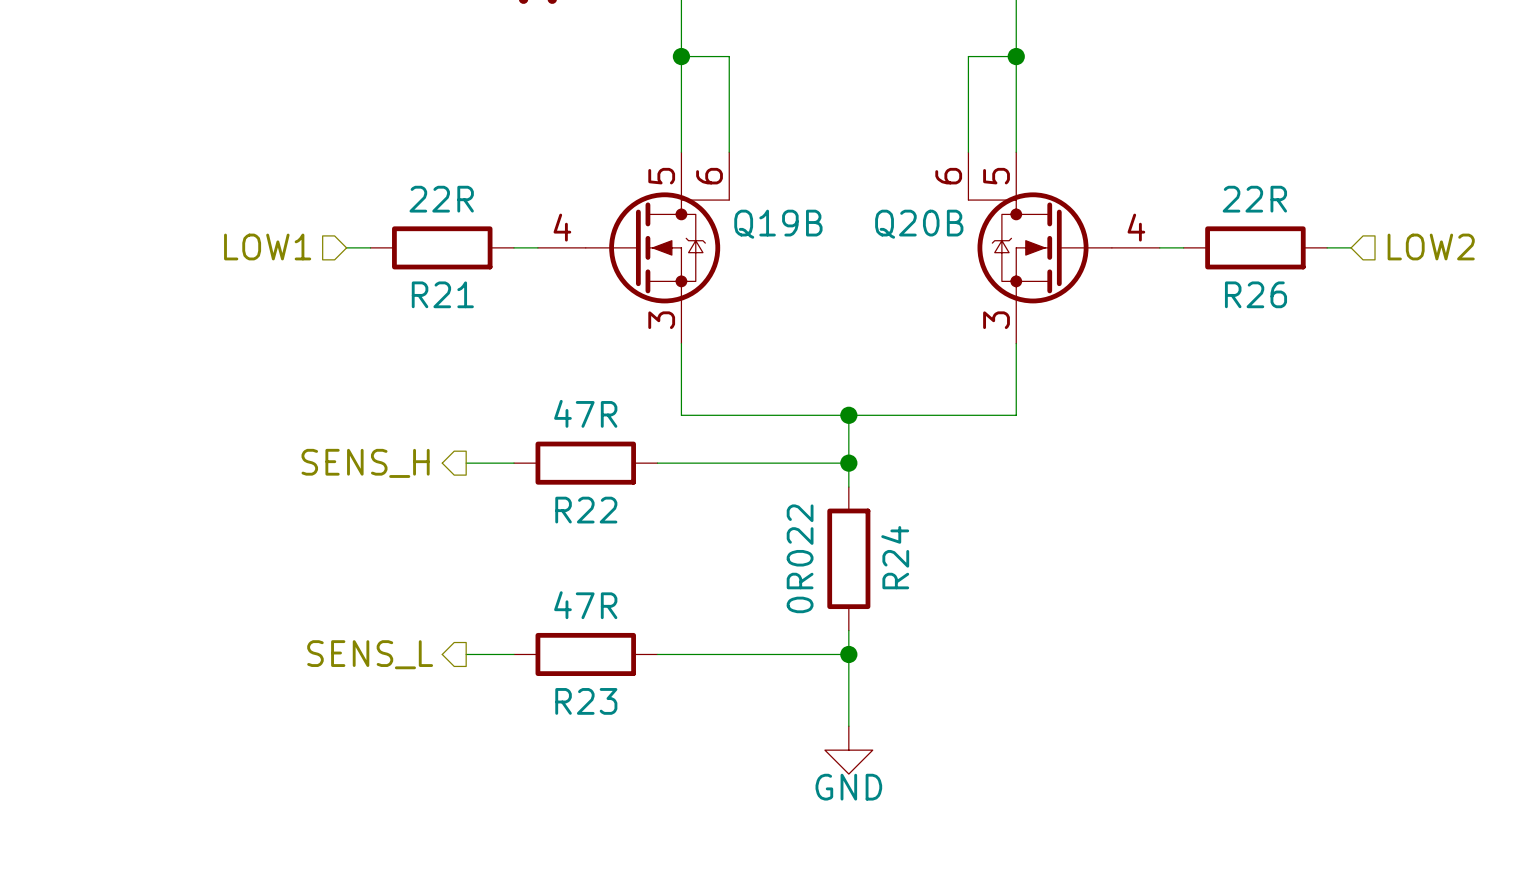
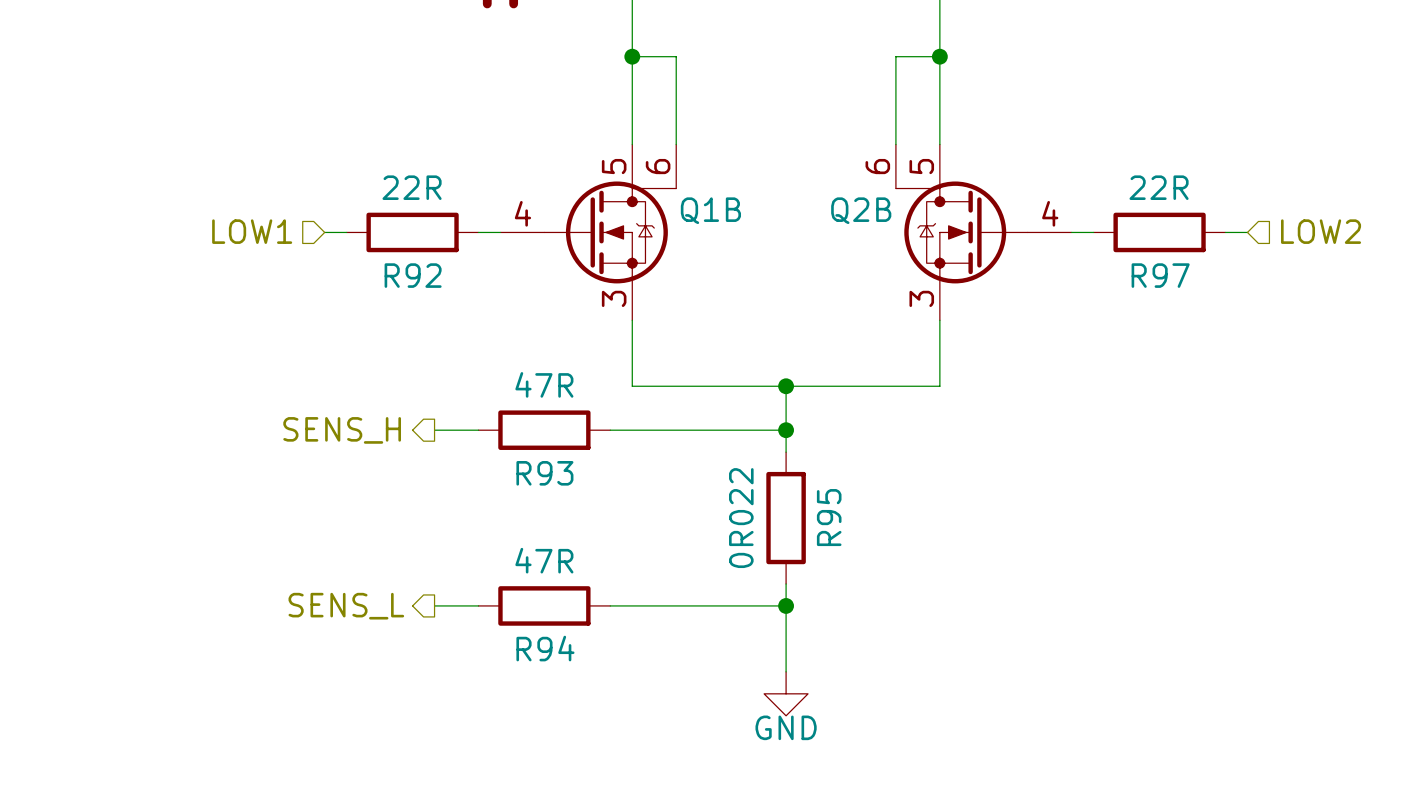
Q19B name: Q19B (778, 224) -> Q1B (710, 210)
Q20B name: Q20B (919, 224) -> Q2B (861, 210)
R21 name: R21 (442, 294) -> R92 (413, 275)
R26 name: R26 (1255, 294) -> R97 (1160, 275)
R22 name: R22 (586, 510) -> R93 (544, 473)
R24 name: R24 (895, 557) -> R95 (829, 517)
R23 name: R23 (586, 701) -> R94 (545, 648)

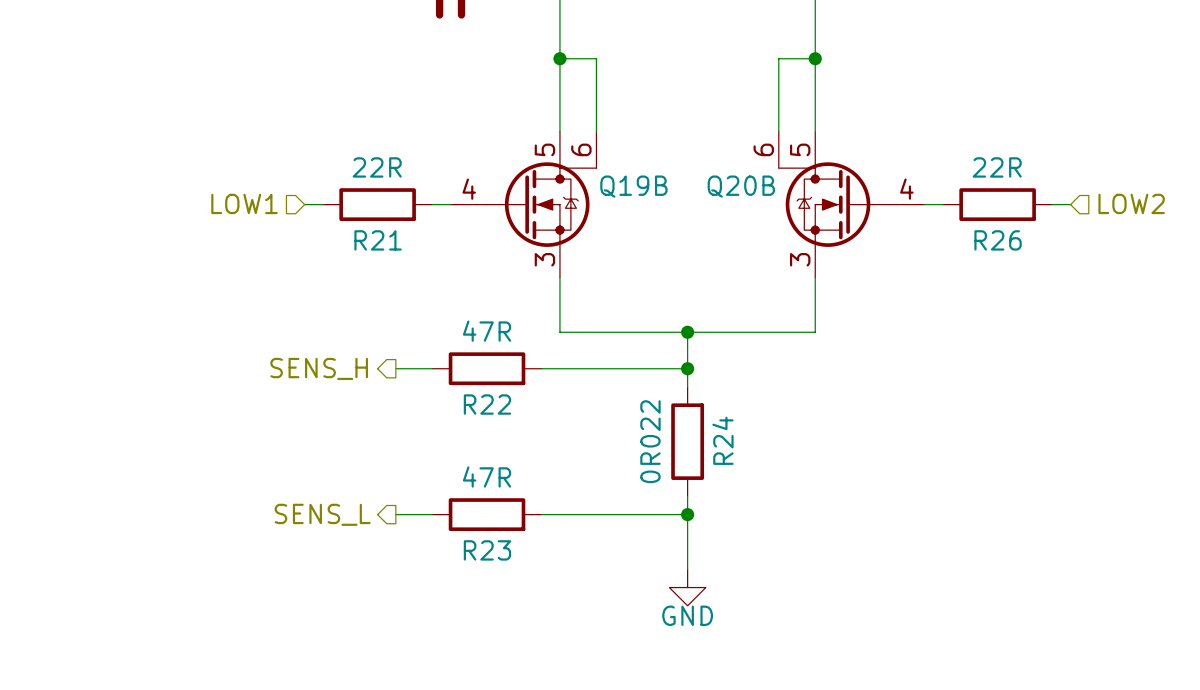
Q1B name: Q1B (710, 210) -> Q19B (633, 186)
Q2B name: Q2B (861, 210) -> Q20B (741, 186)
R92 name: R92 (413, 275) -> R21 (378, 240)
R97 name: R97 (1160, 275) -> R26 (998, 240)
R93 name: R93 (544, 473) -> R22 (487, 404)
R95 name: R95 (829, 517) -> R24 (722, 440)
R94 name: R94 (545, 648) -> R23 (487, 550)

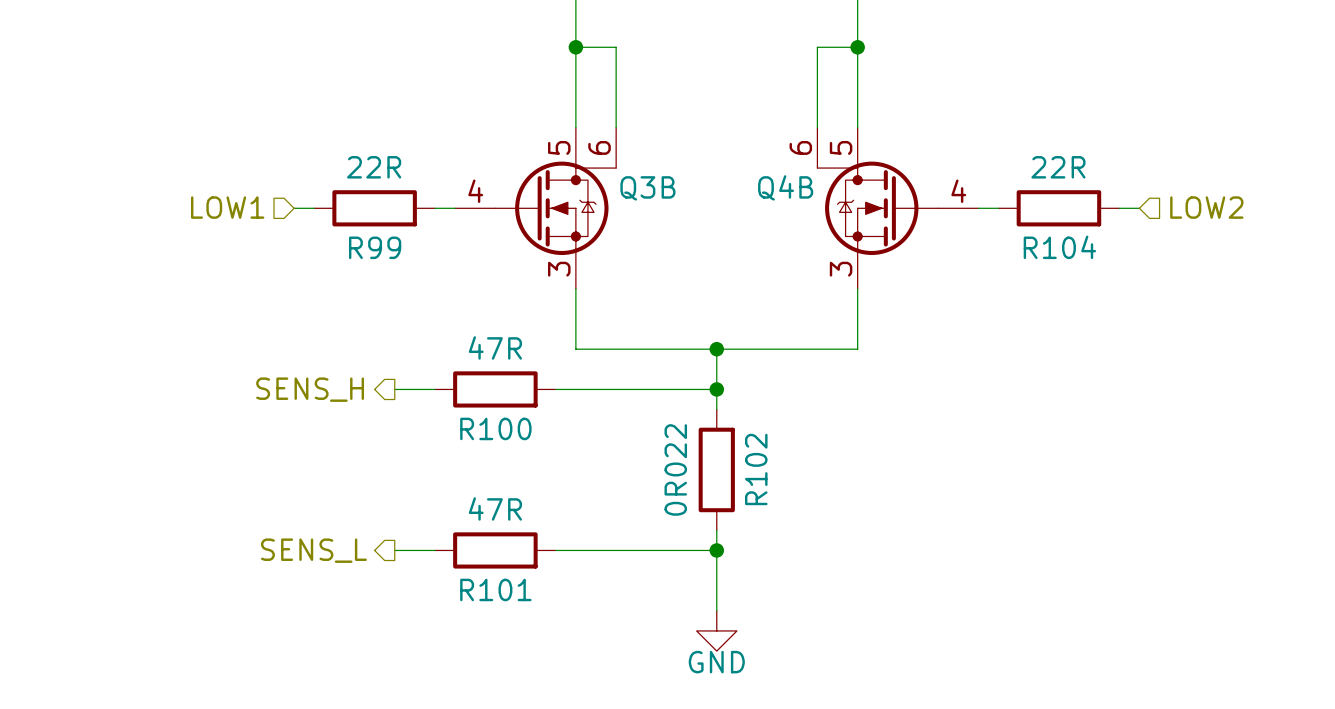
Q19B name: Q19B (633, 186) -> Q3B (647, 188)
Q20B name: Q20B (741, 186) -> Q4B (785, 187)
R21 name: R21 (378, 240) -> R99 (375, 247)
R26 name: R26 (998, 240) -> R104 (1059, 247)
R22 name: R22 (487, 404) -> R100 (495, 428)
R24 name: R24 (722, 440) -> R102 (756, 469)
R23 name: R23 (487, 550) -> R101 (495, 589)

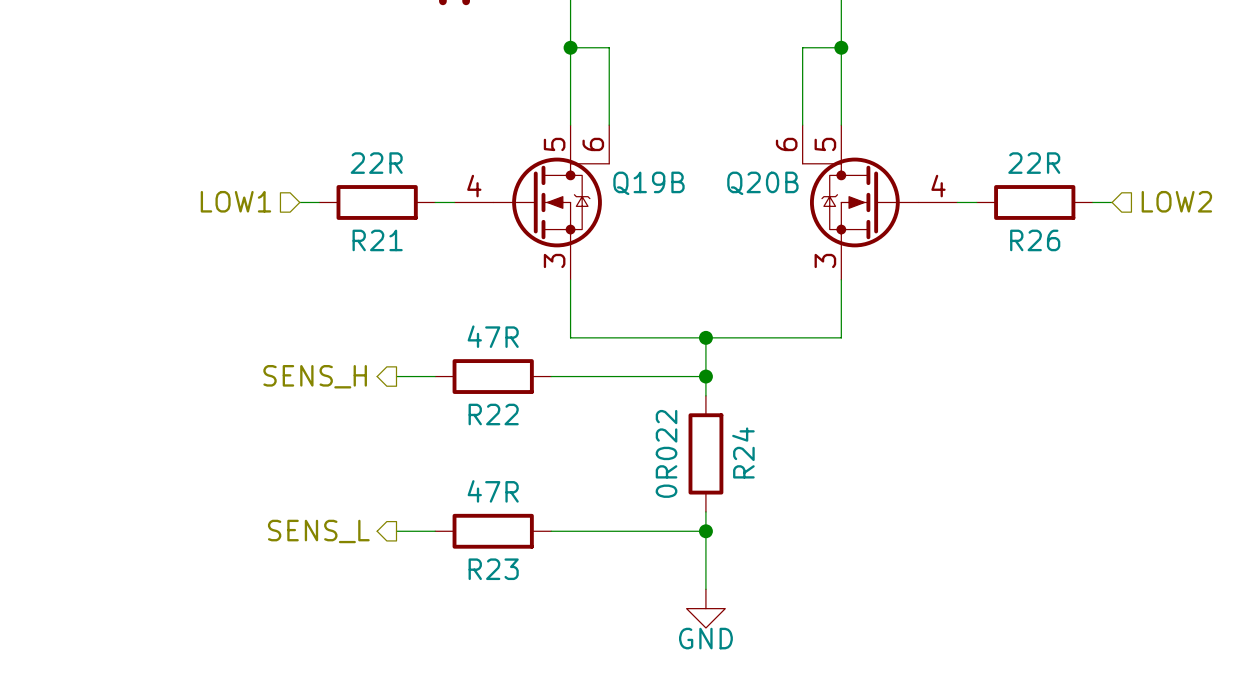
Q4B name: Q4B (785, 187) -> Q20B (762, 183)
Q3B name: Q3B (647, 188) -> Q19B (648, 183)
R99 name: R99 (375, 247) -> R21 (377, 240)
R104 name: R104 (1059, 247) -> R26 (1035, 240)
R100 name: R100 (495, 428) -> R22 (493, 414)
R102 name: R102 (756, 469) -> R24 (743, 452)
R101 name: R101 (495, 589) -> R23 (493, 569)

